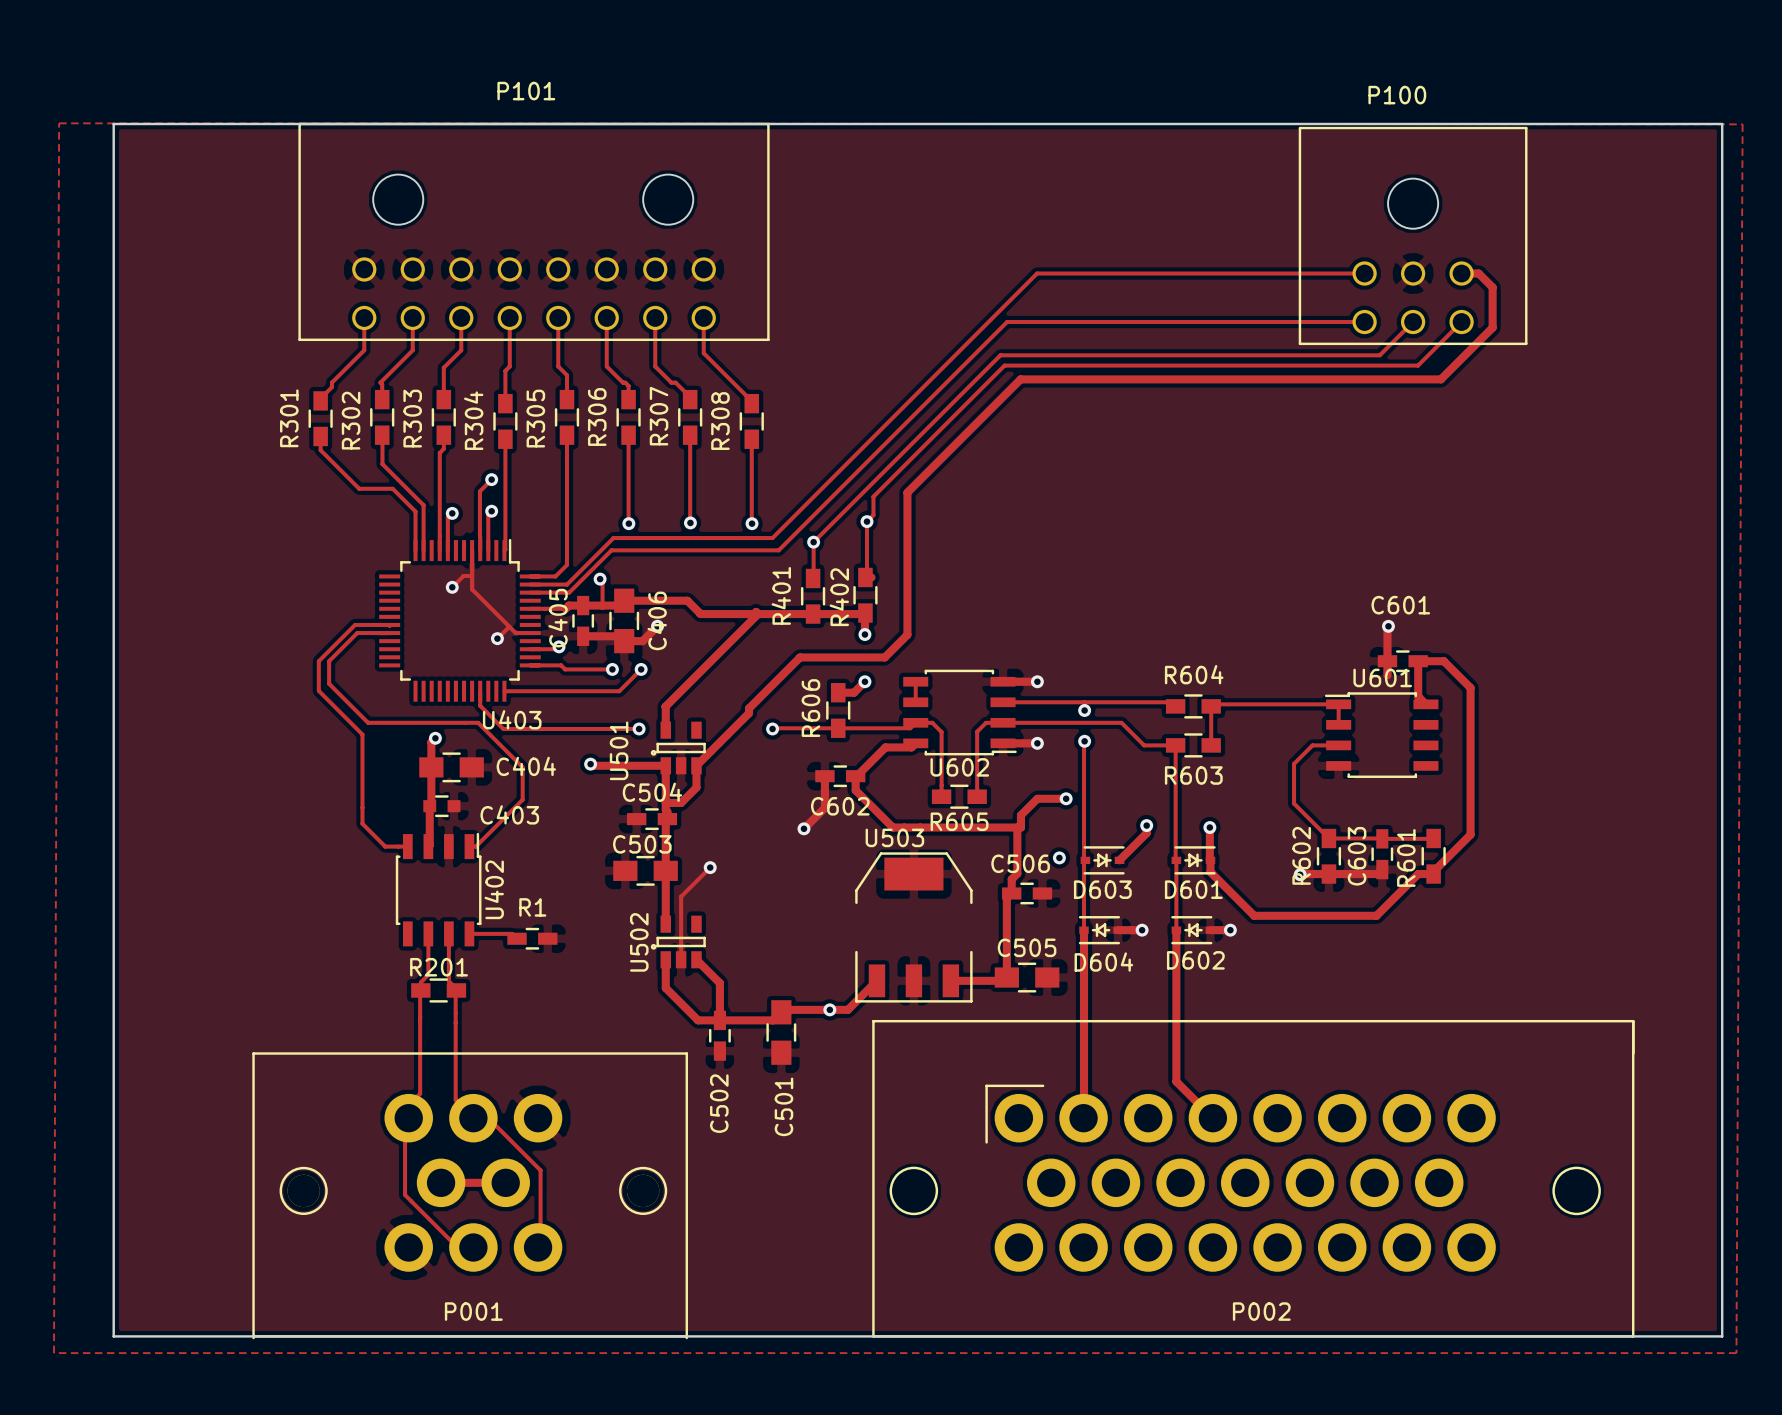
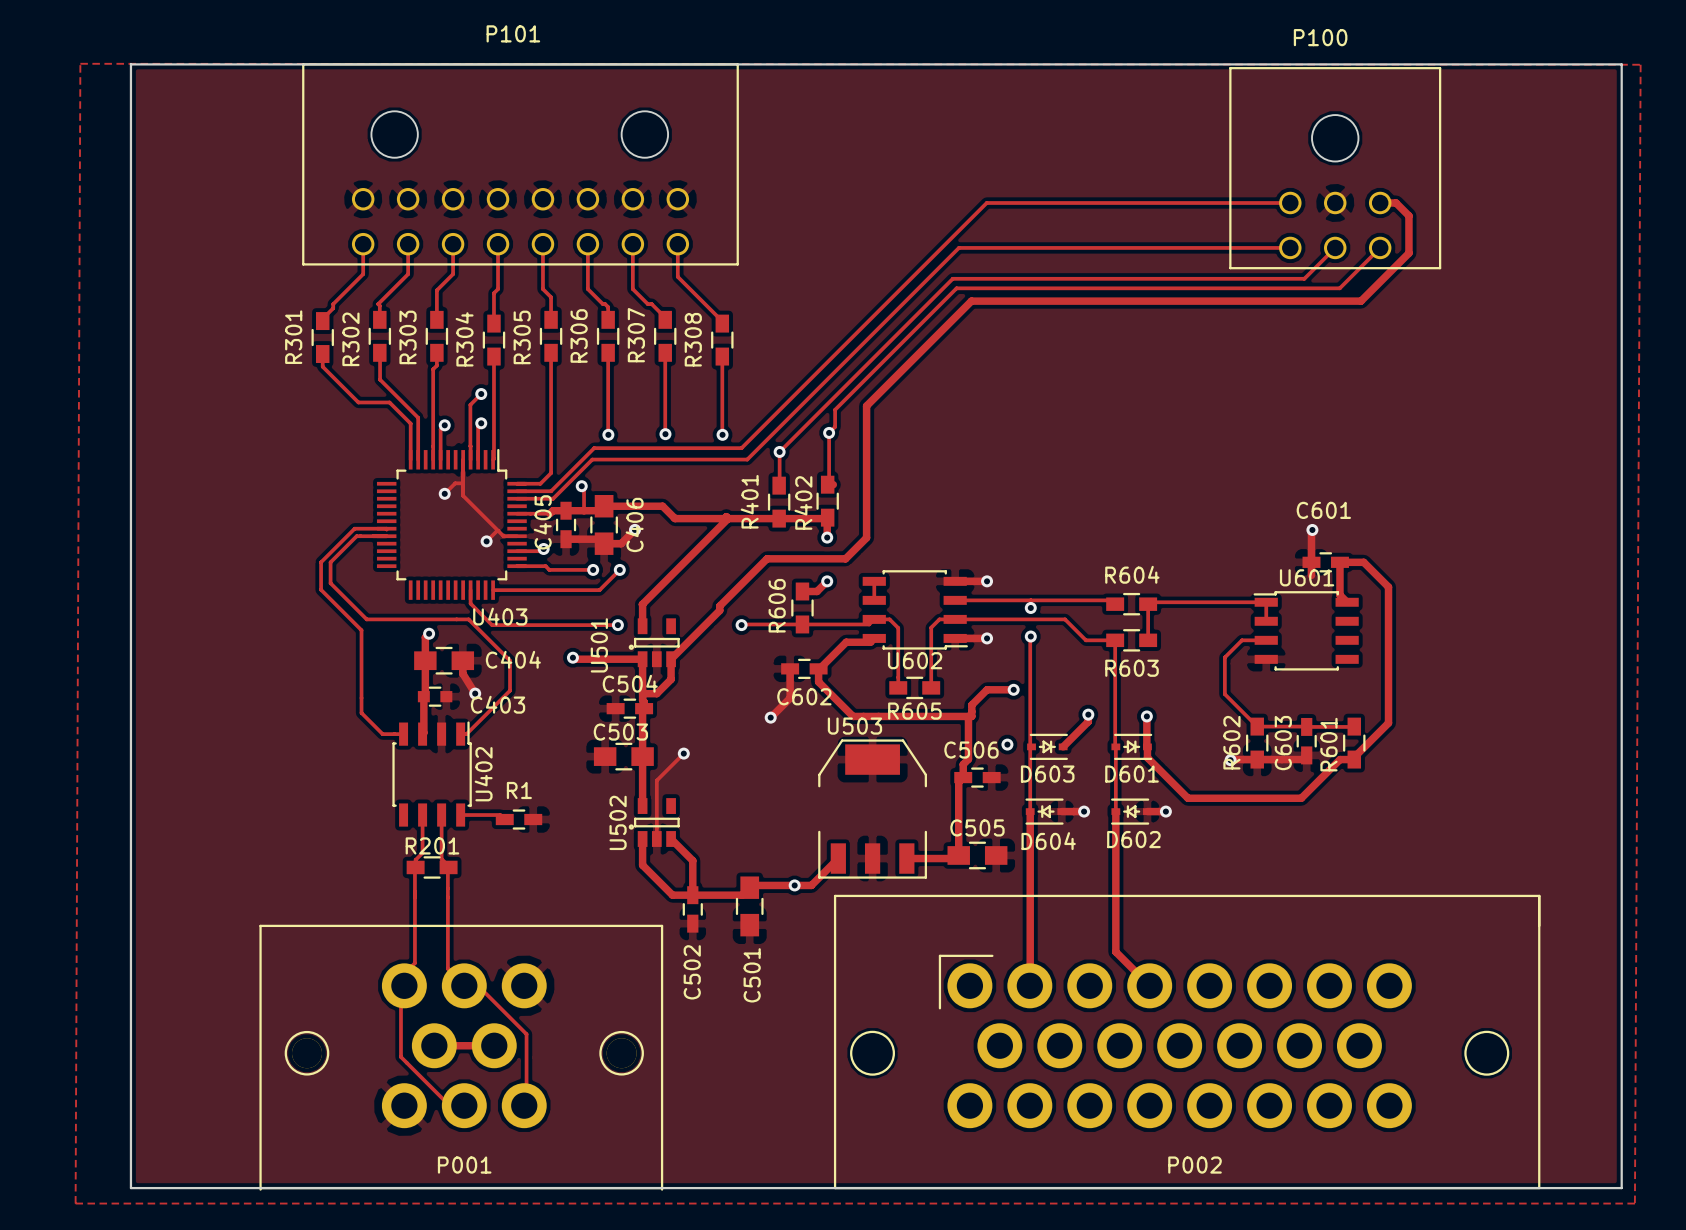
track: none -> (462, 660) (462, 673) (475, 693)
via: none -> (475, 693)

